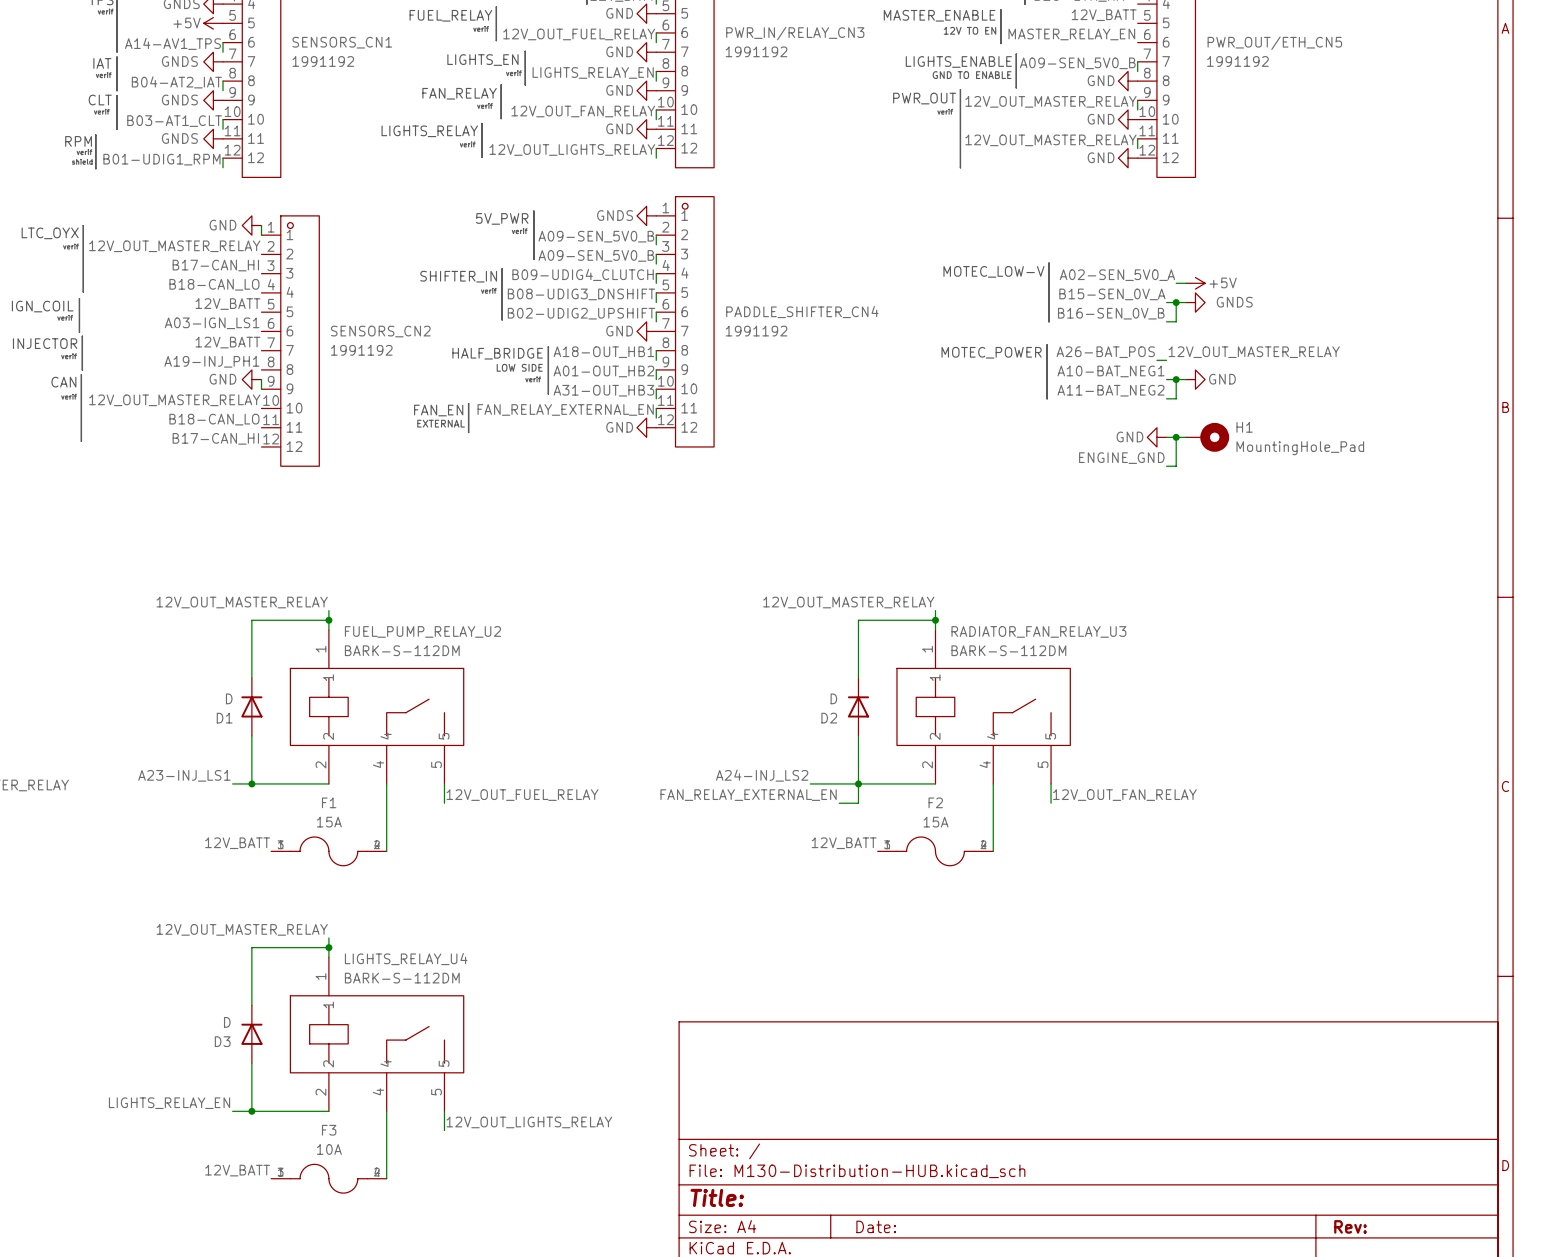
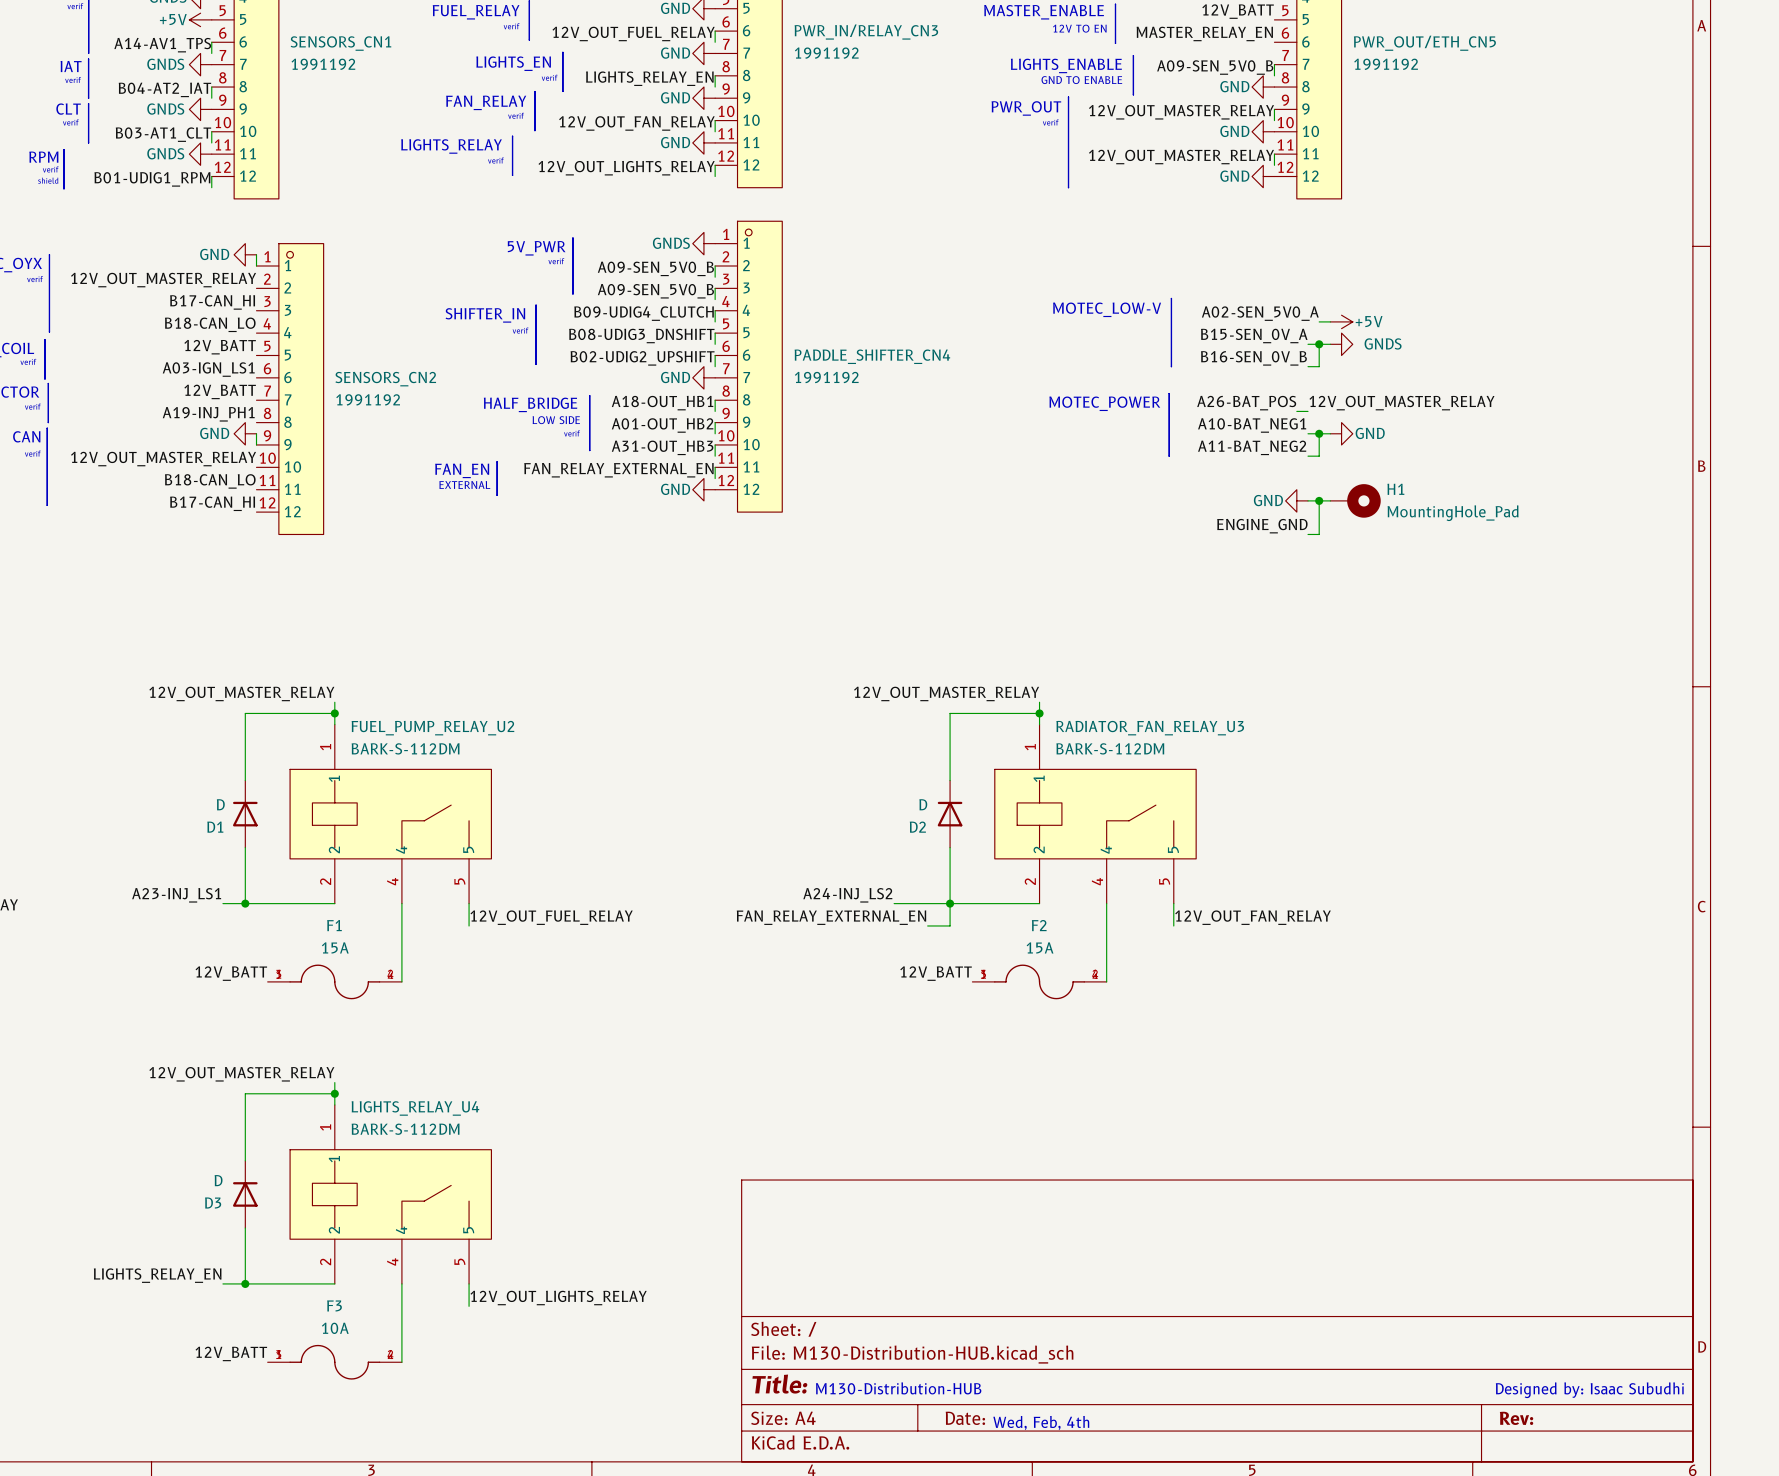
text: none -> M130-Distribution-HUB (898, 1388)
text: none -> Designed by: Isaac Subudhi (1589, 1390)
text: none -> Wed, Feb, 4th (1041, 1423)

